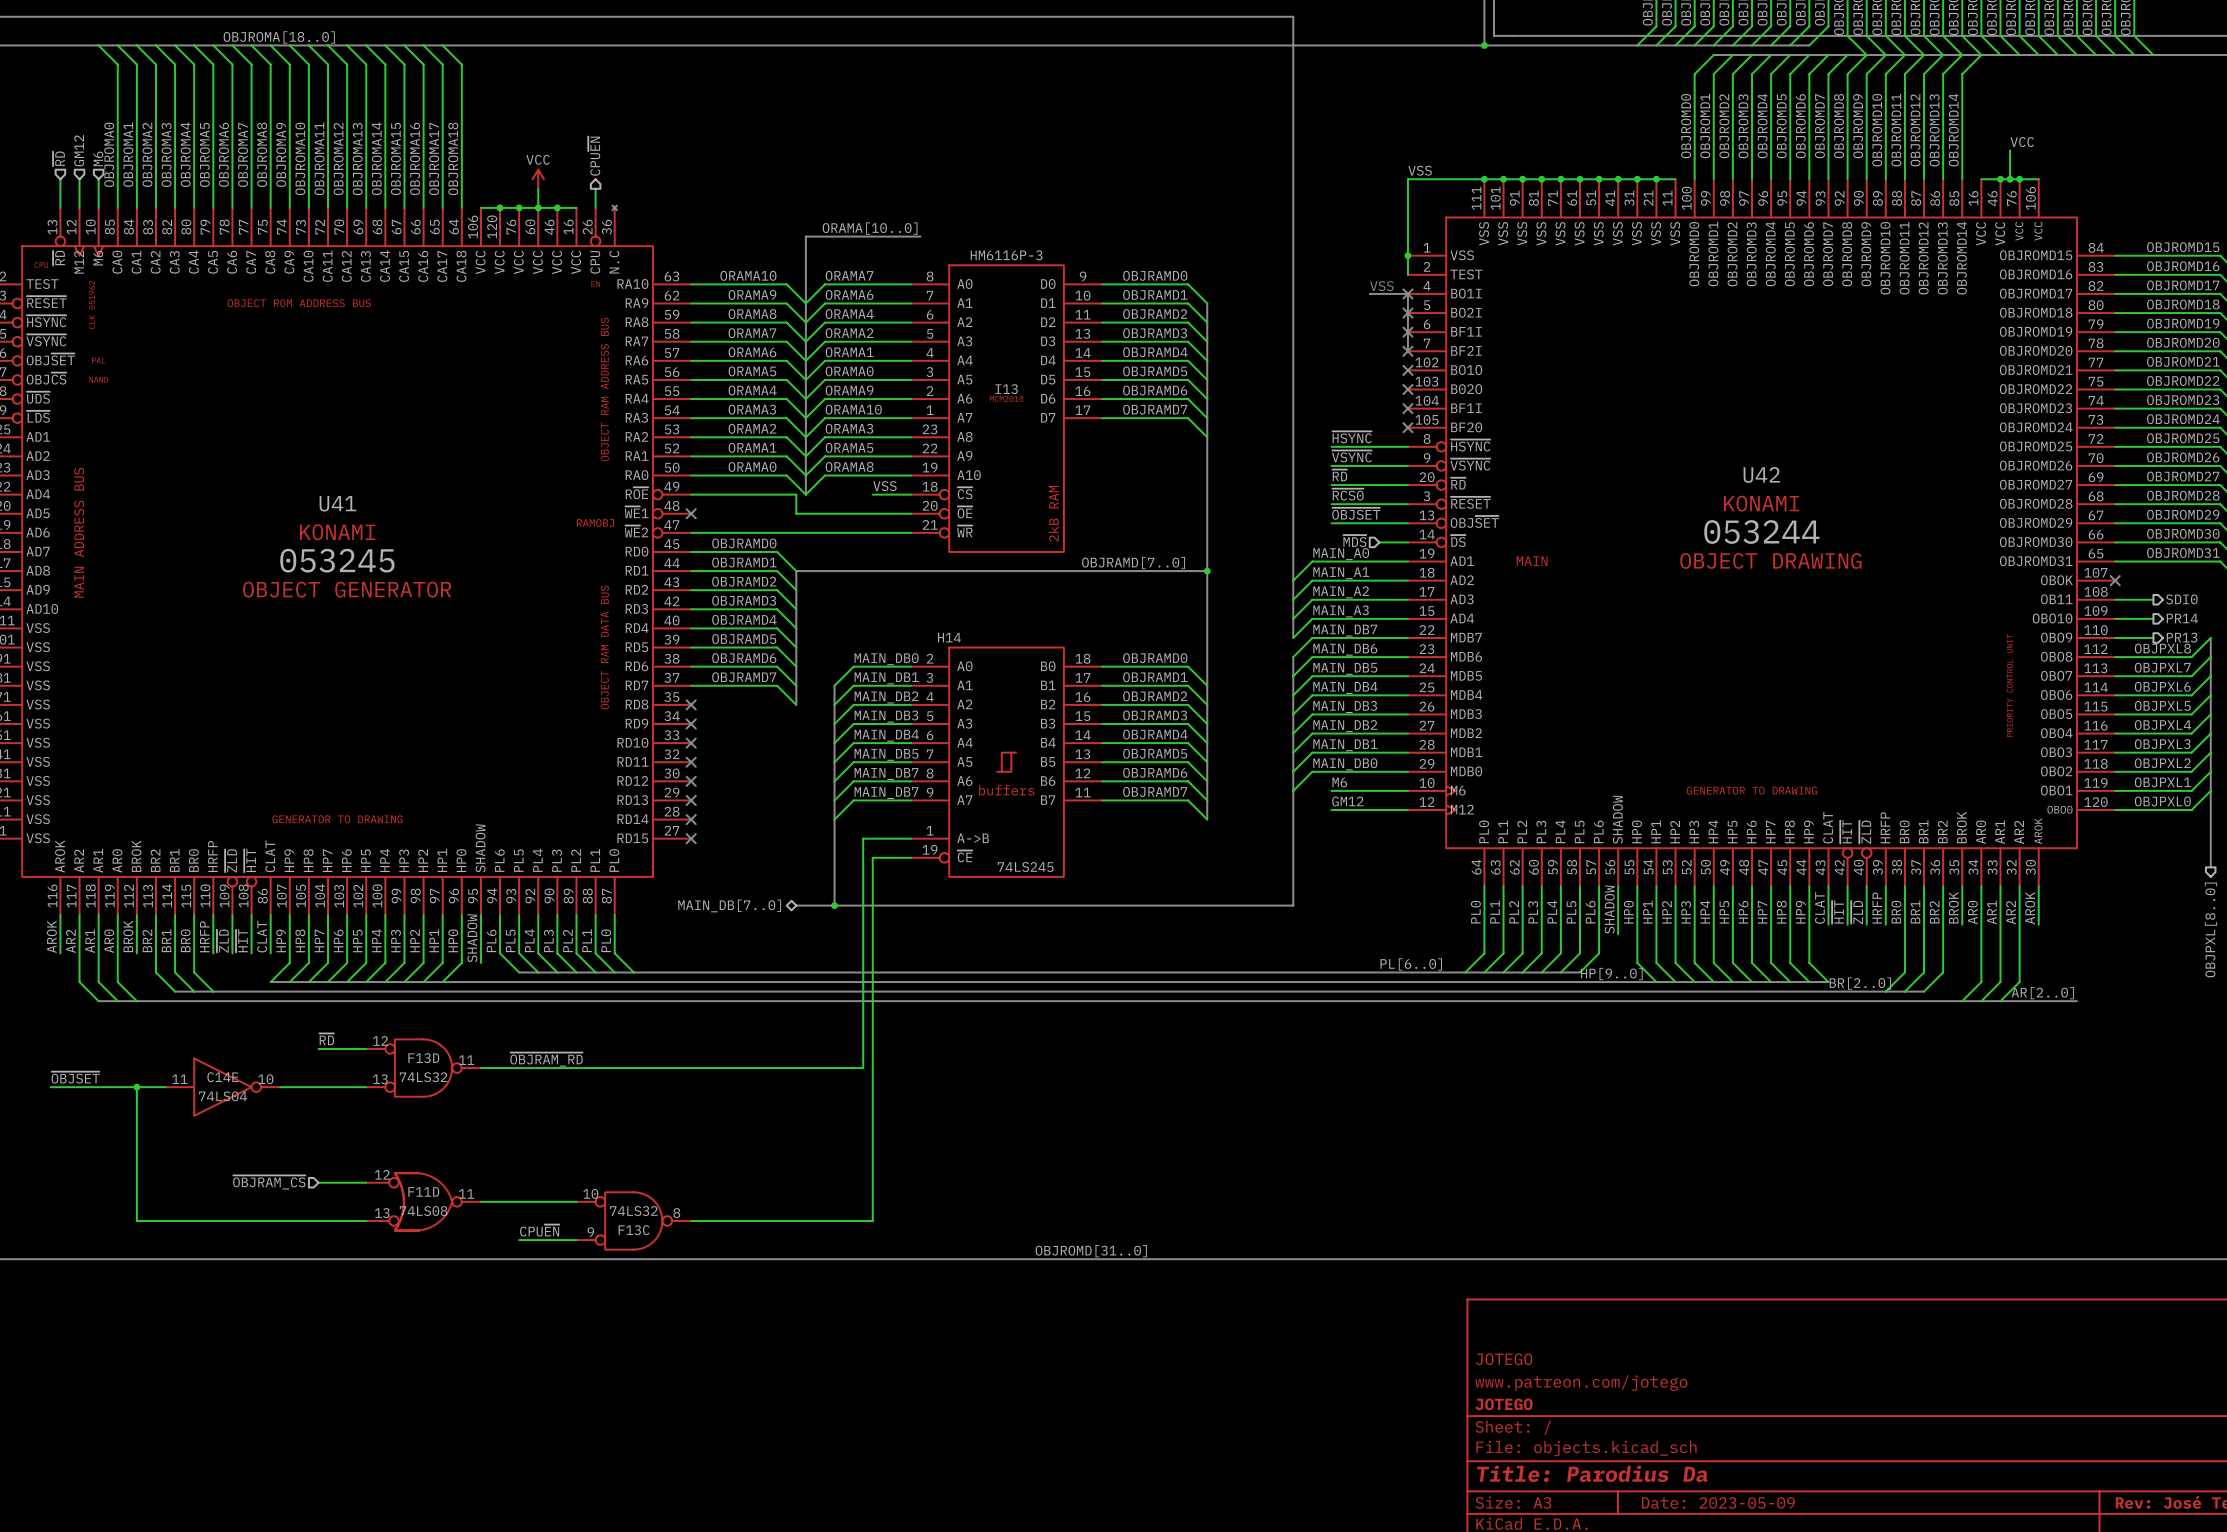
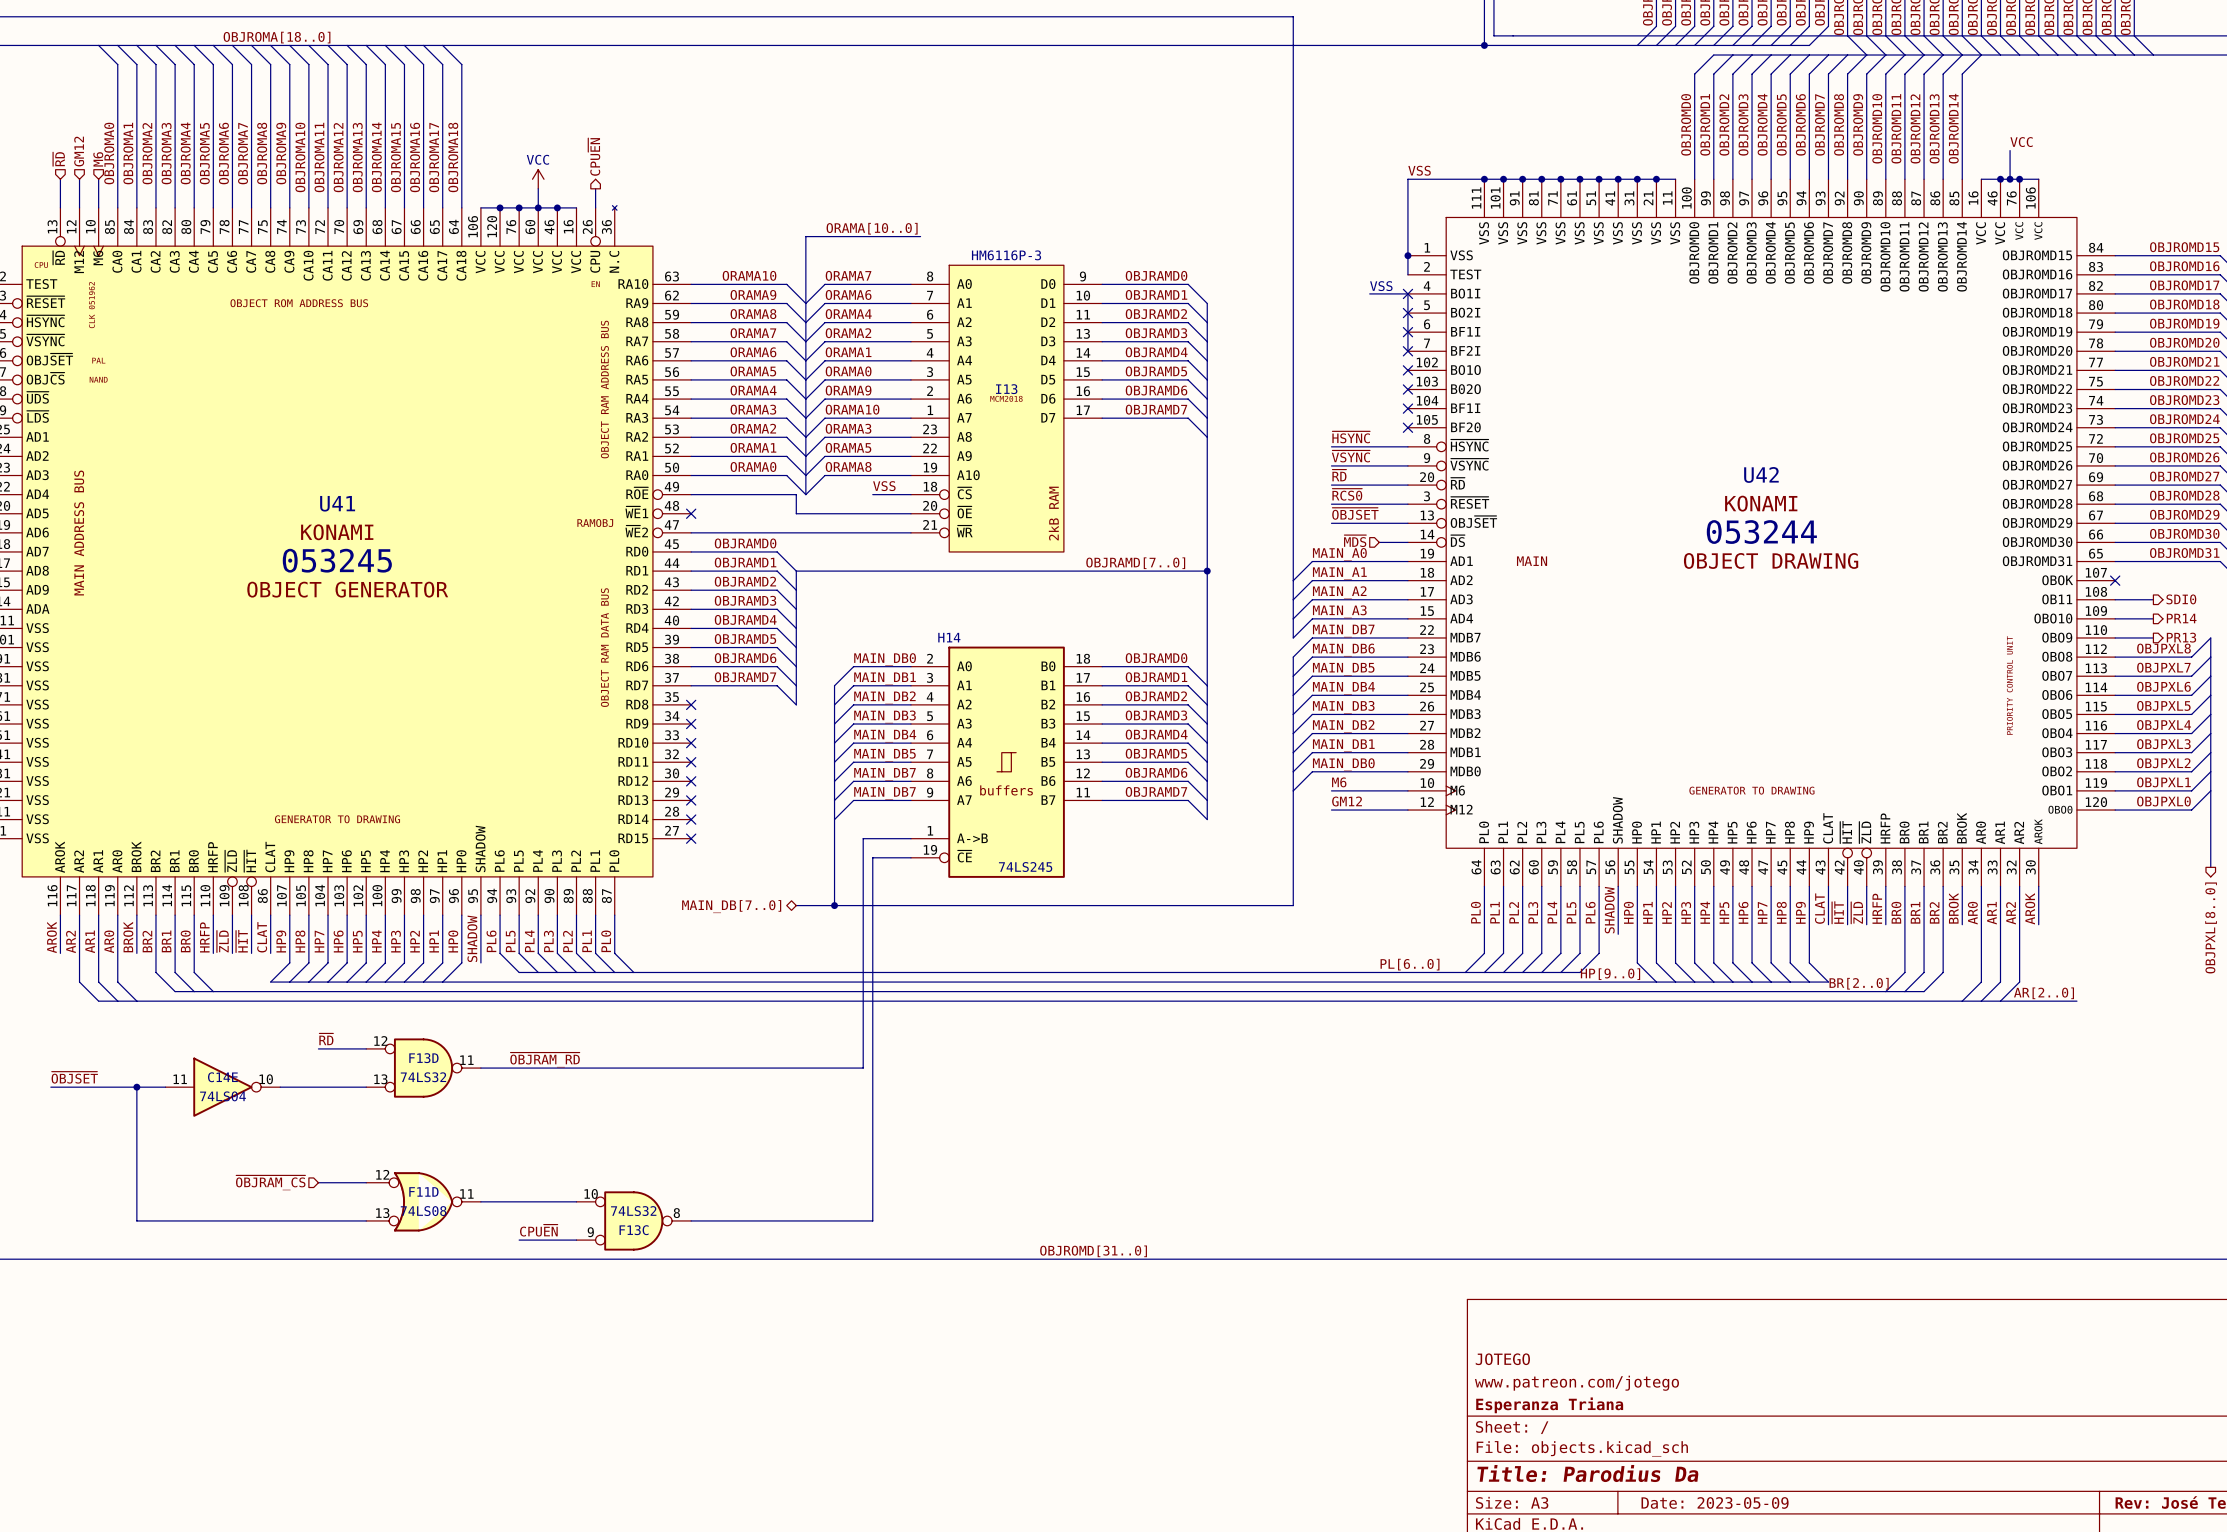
U41 pin name: AD10 (42, 608) -> ADA (37, 608)
title block: JOTEGO (1504, 1404) -> Esperanza Triana (1549, 1405)

